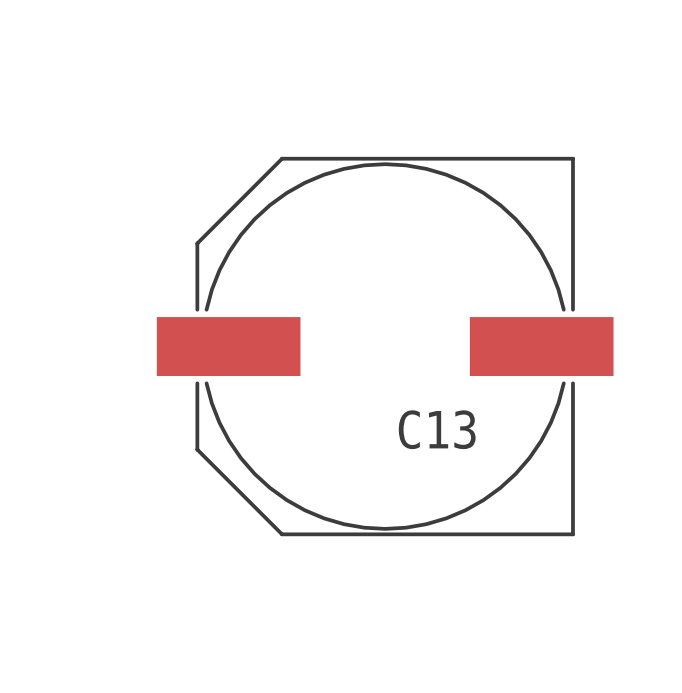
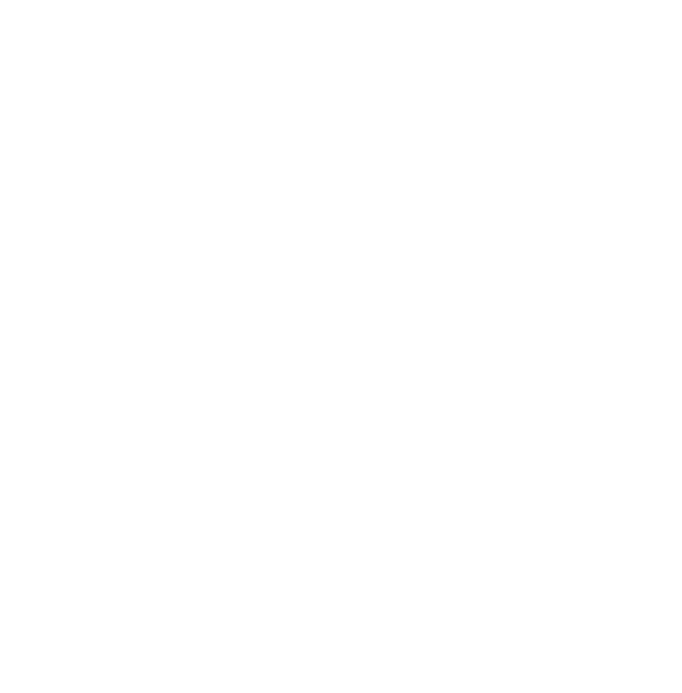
C13: (385, 346) -> none

